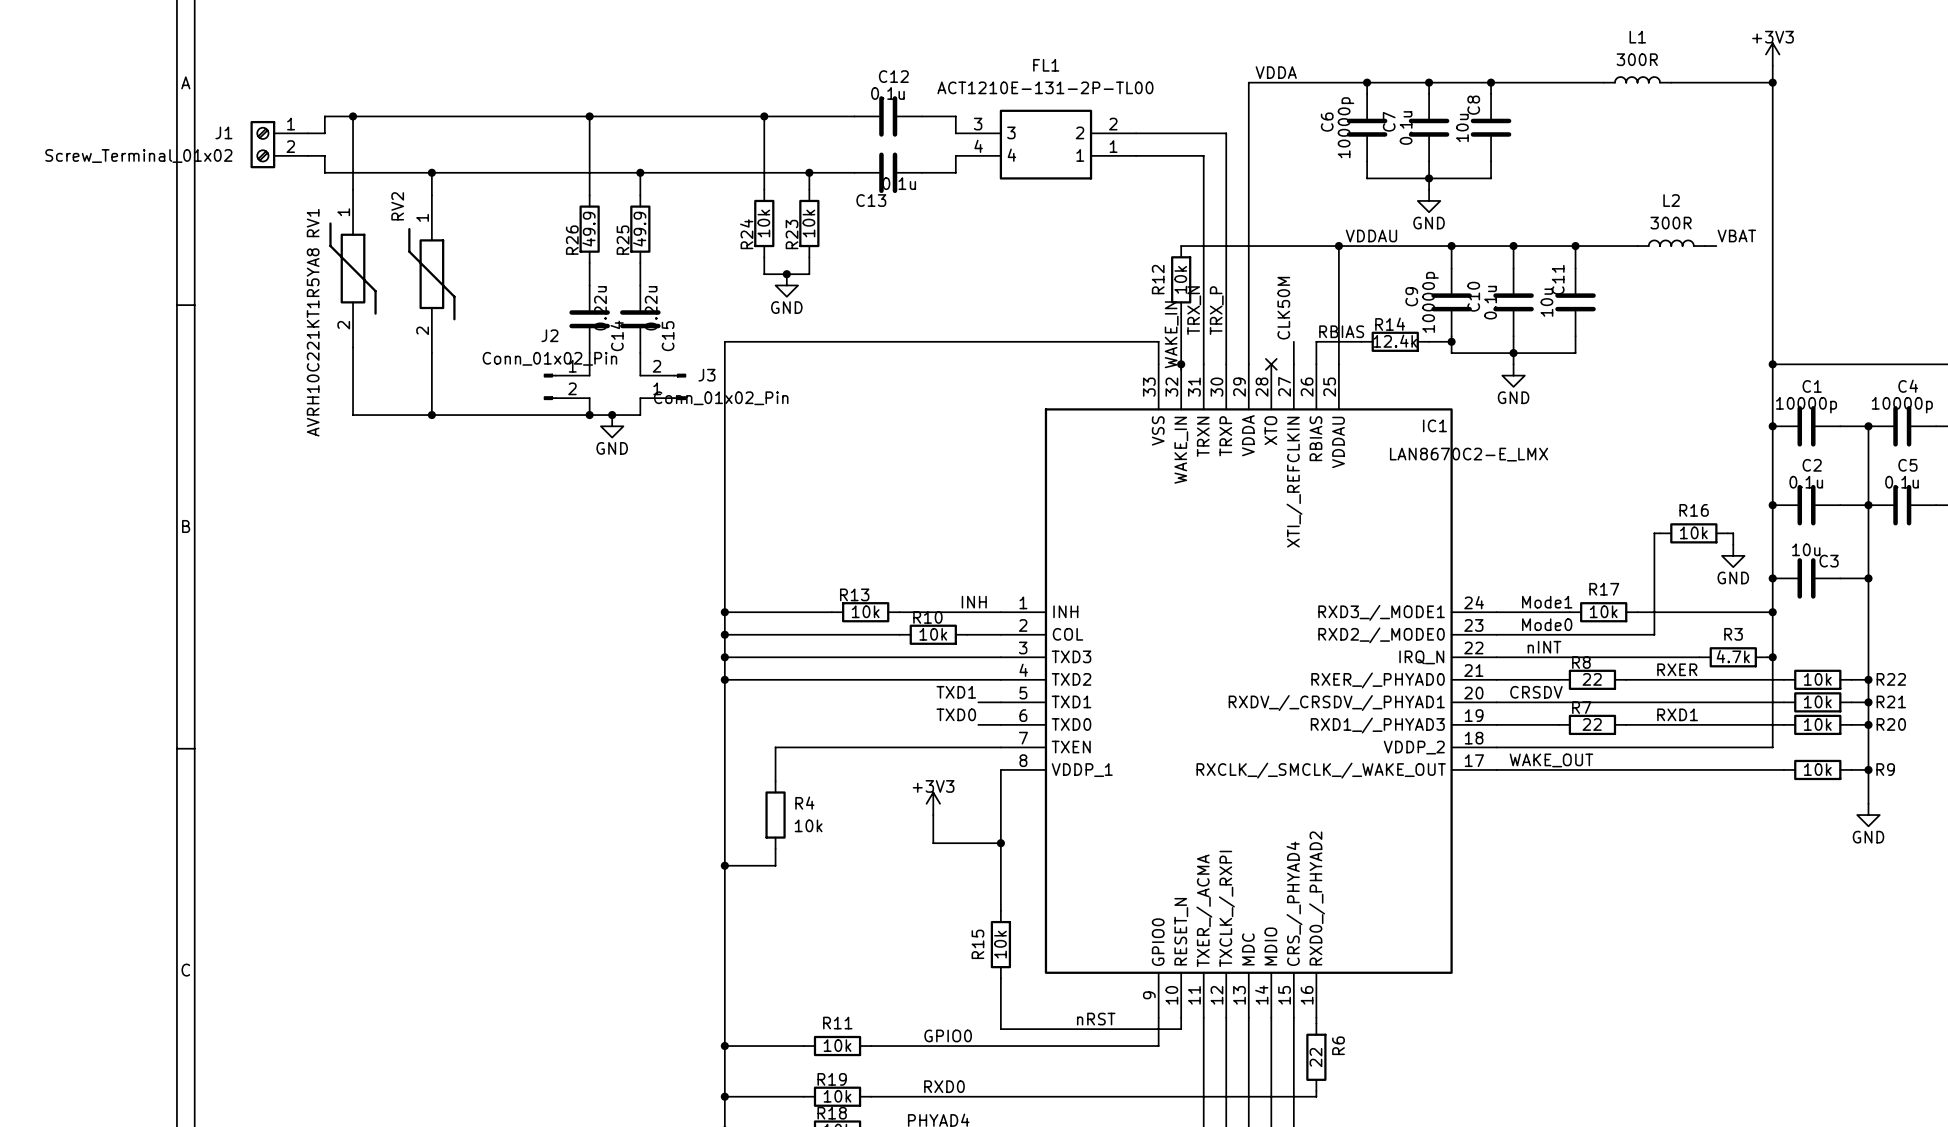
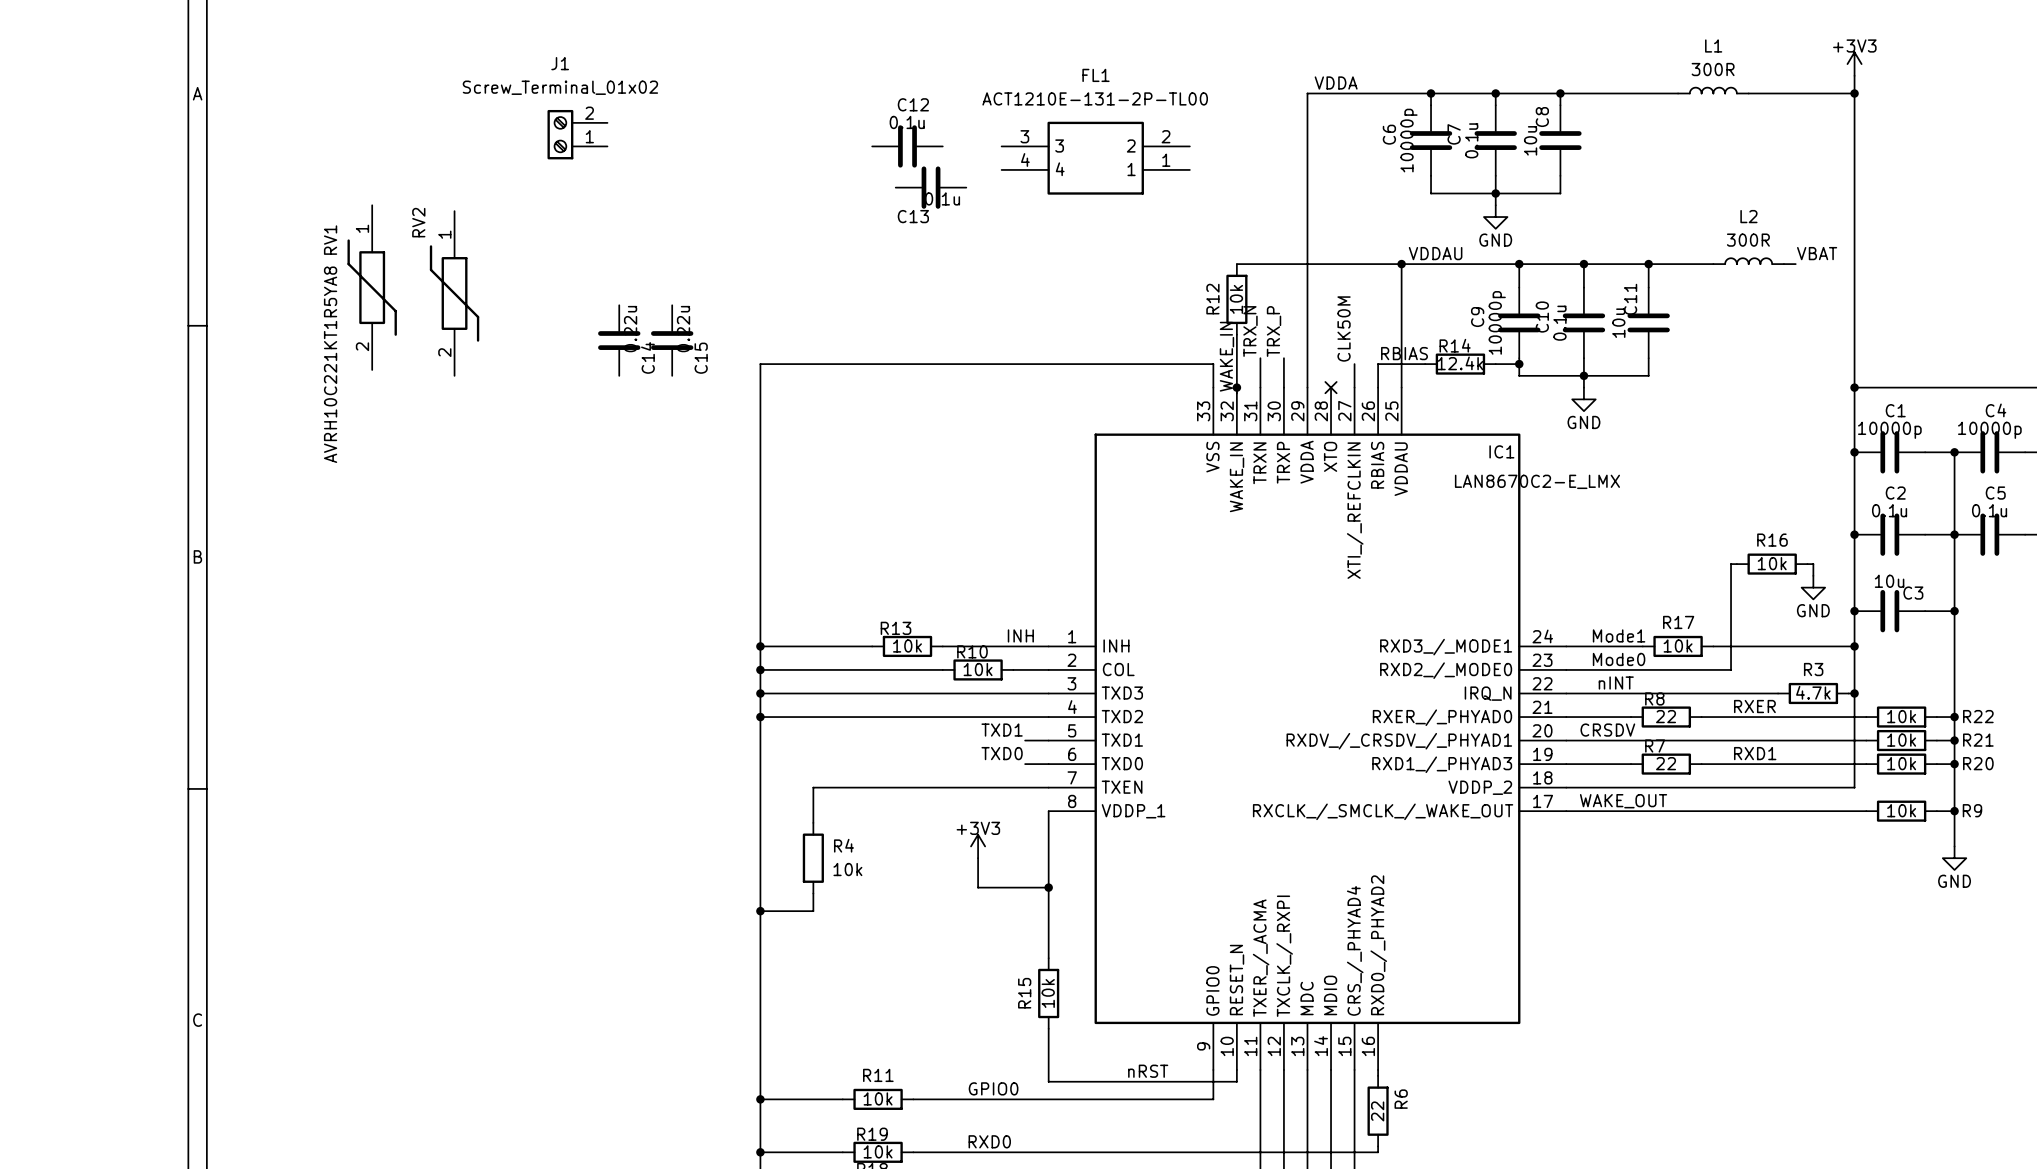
wire: (353, 116) (353, 189) -> none
junction: (353, 116) -> none
wire: (589, 116) (589, 195) -> none
junction: (589, 116) -> none
wire: (764, 116) (764, 189) -> none
junction: (764, 116) -> none
wire: (854, 116) (324, 116) (324, 133) (307, 133) -> none
C12 position: (888, 116) -> (907, 146)
wire: (922, 116) (955, 116) (955, 133) -> none
J1 name position: J1 (223, 132) -> J1 (560, 63)
wire: (1136, 133) (1226, 133) (1226, 336) -> none
J1 flip: as is (262, 144) -> up-down (560, 134)
J1 position: (279, 144) -> (577, 134)
wire: (307, 155) (324, 155) (324, 172) (854, 172) -> none
wire: (955, 155) (955, 172) (922, 172) -> none
wire: (1136, 155) (1203, 155) (1203, 336) -> none
J1 value position: Screw_Terminal_01x02 (138, 156) -> Screw_Terminal_01x02 (560, 87)
wire: (431, 172) (431, 195) -> none
junction: (431, 172) -> none
wire: (640, 172) (640, 195) -> none
junction: (640, 172) -> none
wire: (809, 172) (809, 189) -> none
junction: (809, 172) -> none
R24: 10k (764, 223) -> none
R23: 10k (809, 223) -> none
R26: 49.9 (589, 229) -> none
R25: 49.9 (640, 229) -> none
wire: (764, 257) (764, 274) (809, 274) (809, 257) -> none
wire: (589, 262) (589, 285) -> none
wire: (640, 262) (640, 285) -> none
junction: (786, 274) -> none
power symbol: GND (786, 285) -> none
wire: (353, 347) (353, 415) (640, 415) (640, 398) -> none
wire: (431, 353) (431, 415) -> none
wire: (589, 353) (589, 375) -> none
wire: (640, 353) (640, 375) -> none
J2: Conn_01x02_Pin (566, 386) -> none
J3: Conn_01x02_Pin (663, 386) -> none
wire: (589, 398) (589, 415) -> none
junction: (431, 415) -> none
junction: (589, 415) -> none
junction: (612, 415) -> none
power symbol: GND (612, 426) -> none

